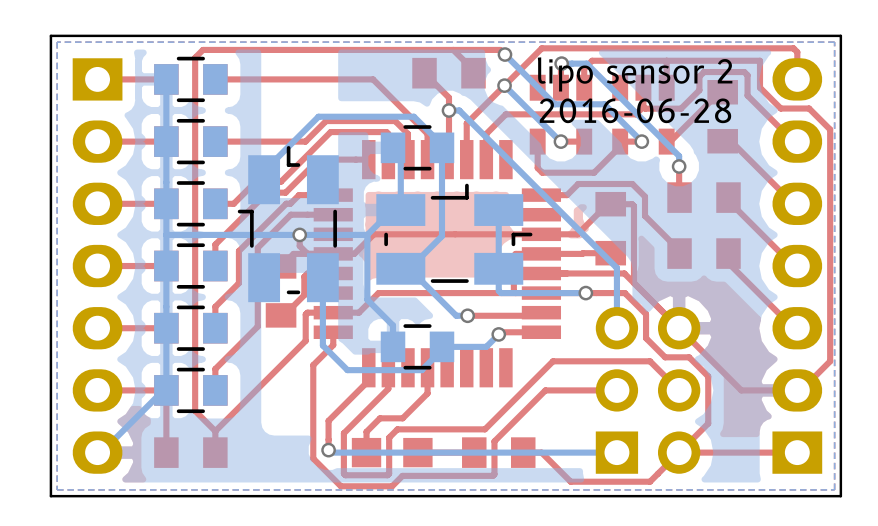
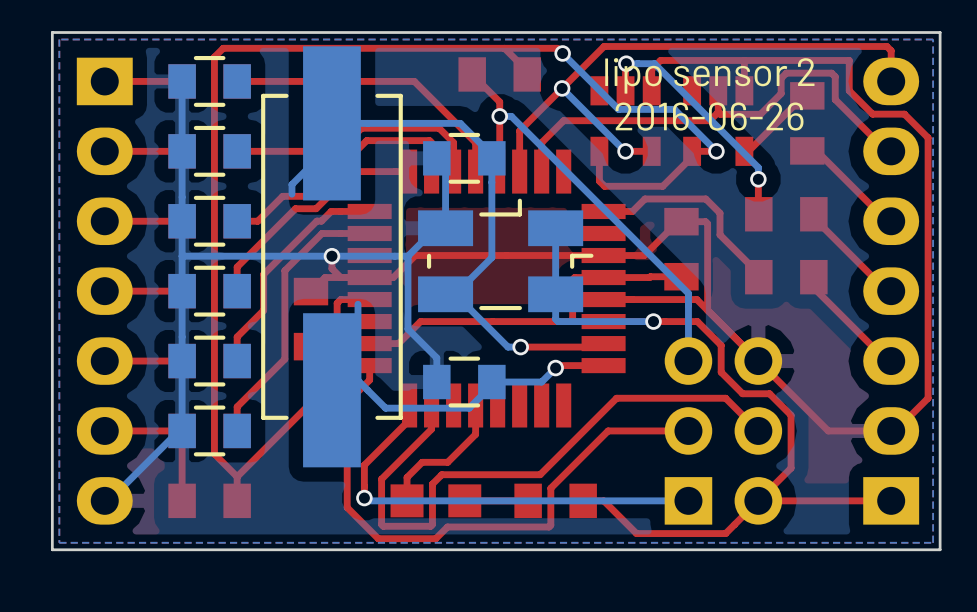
text: 2016-06-28 (635, 110) -> 2016-06-26 (709, 116)
part footprint: [237, 146, 339, 303] -> [261, 46, 403, 468]

